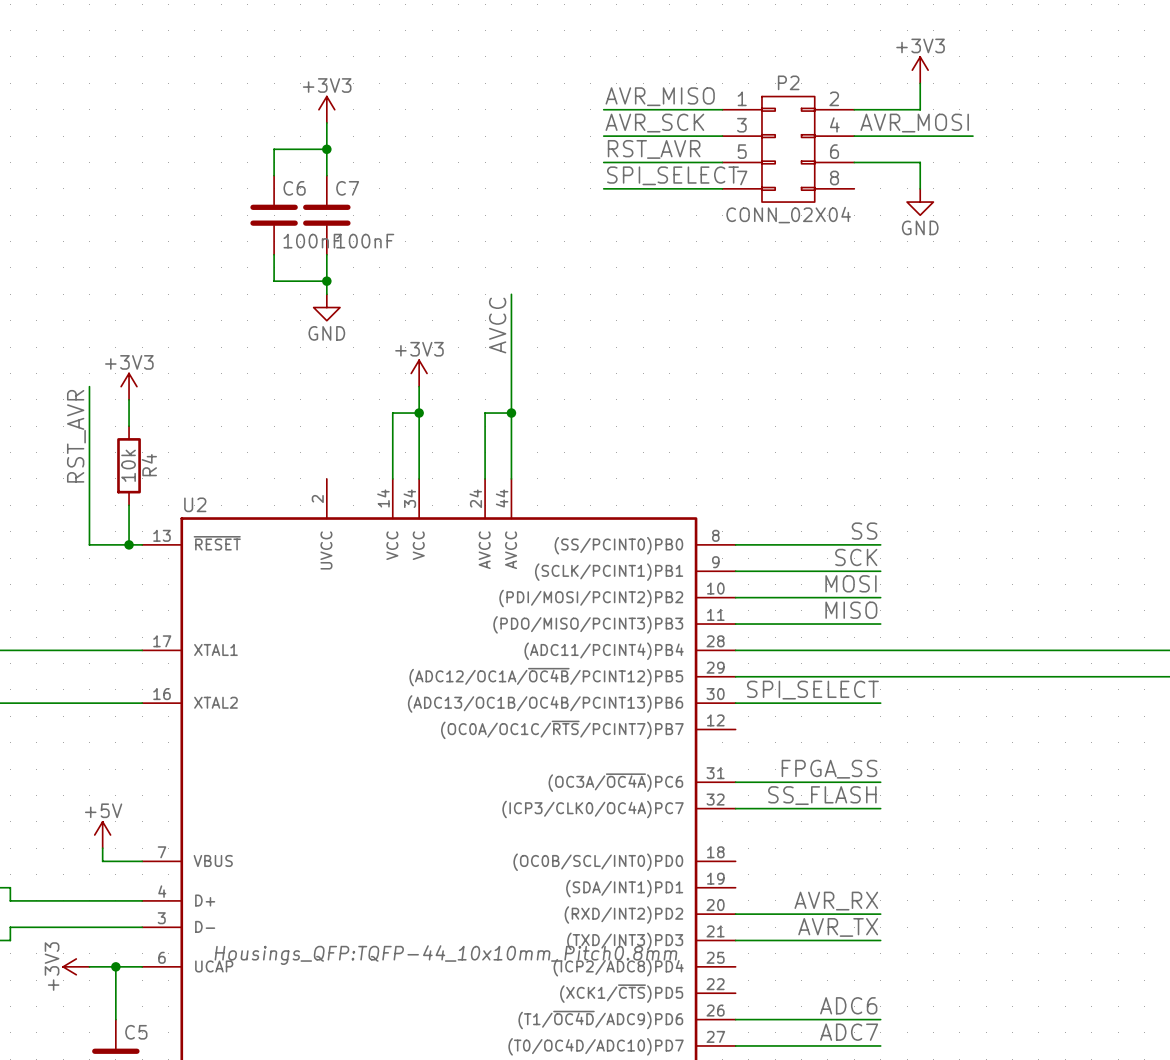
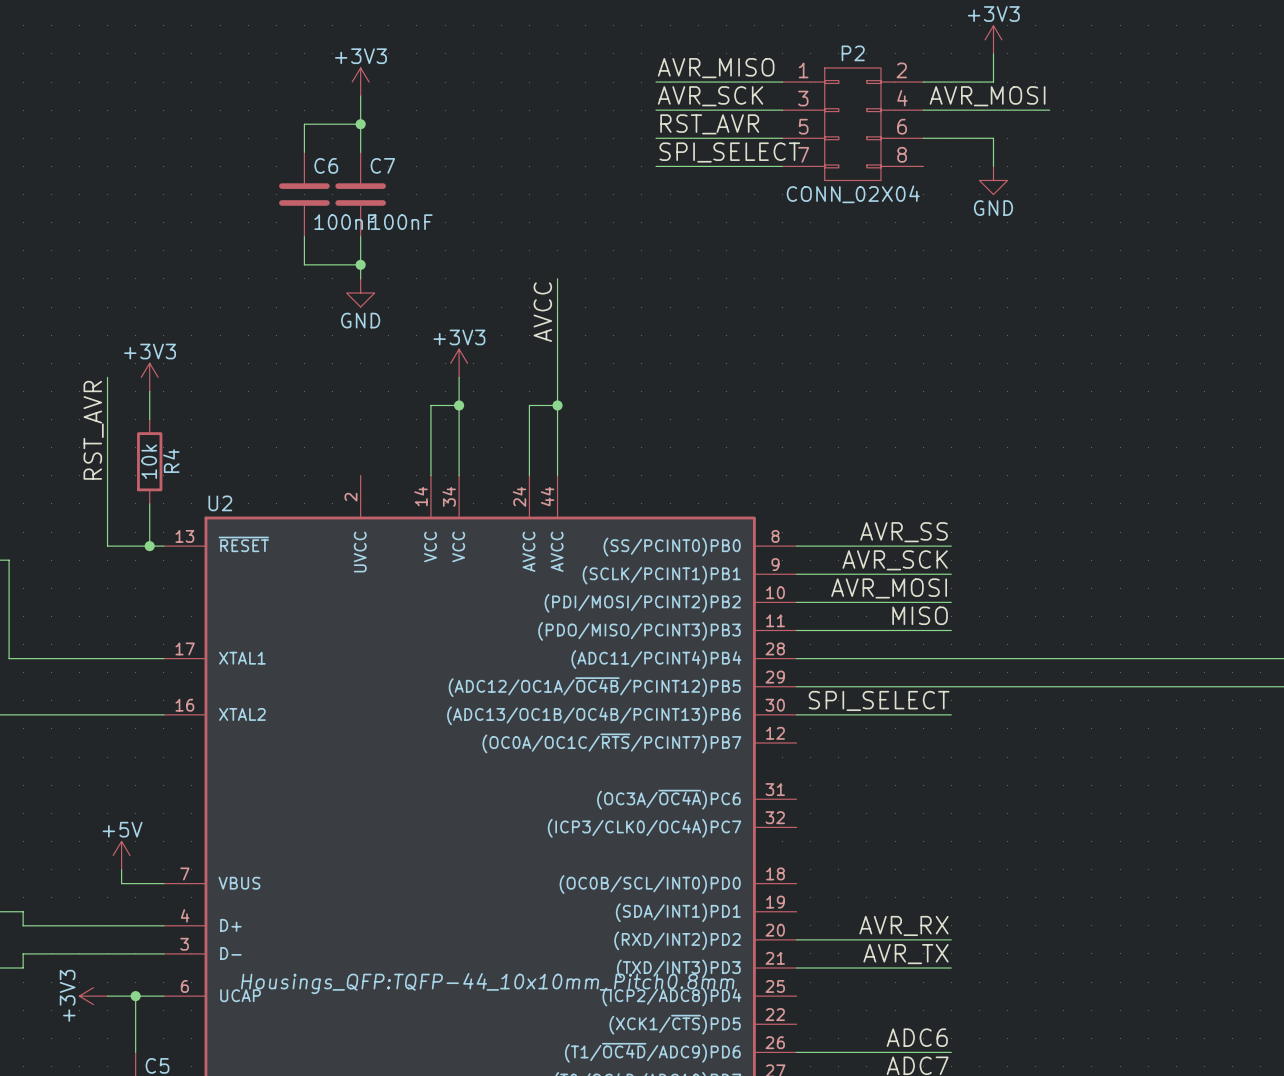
label: SS (864, 531) -> AVR_SS (903, 532)
label: SCK (856, 557) -> AVR_SCK (895, 560)
label: MOSI (850, 583) -> AVR_MOSI (889, 588)
label: FPGA_SS (829, 769) -> none
wire: (735, 782) (880, 782) -> none
label: SS_FLASH (822, 795) -> none
wire: (735, 808) (880, 808) -> none

